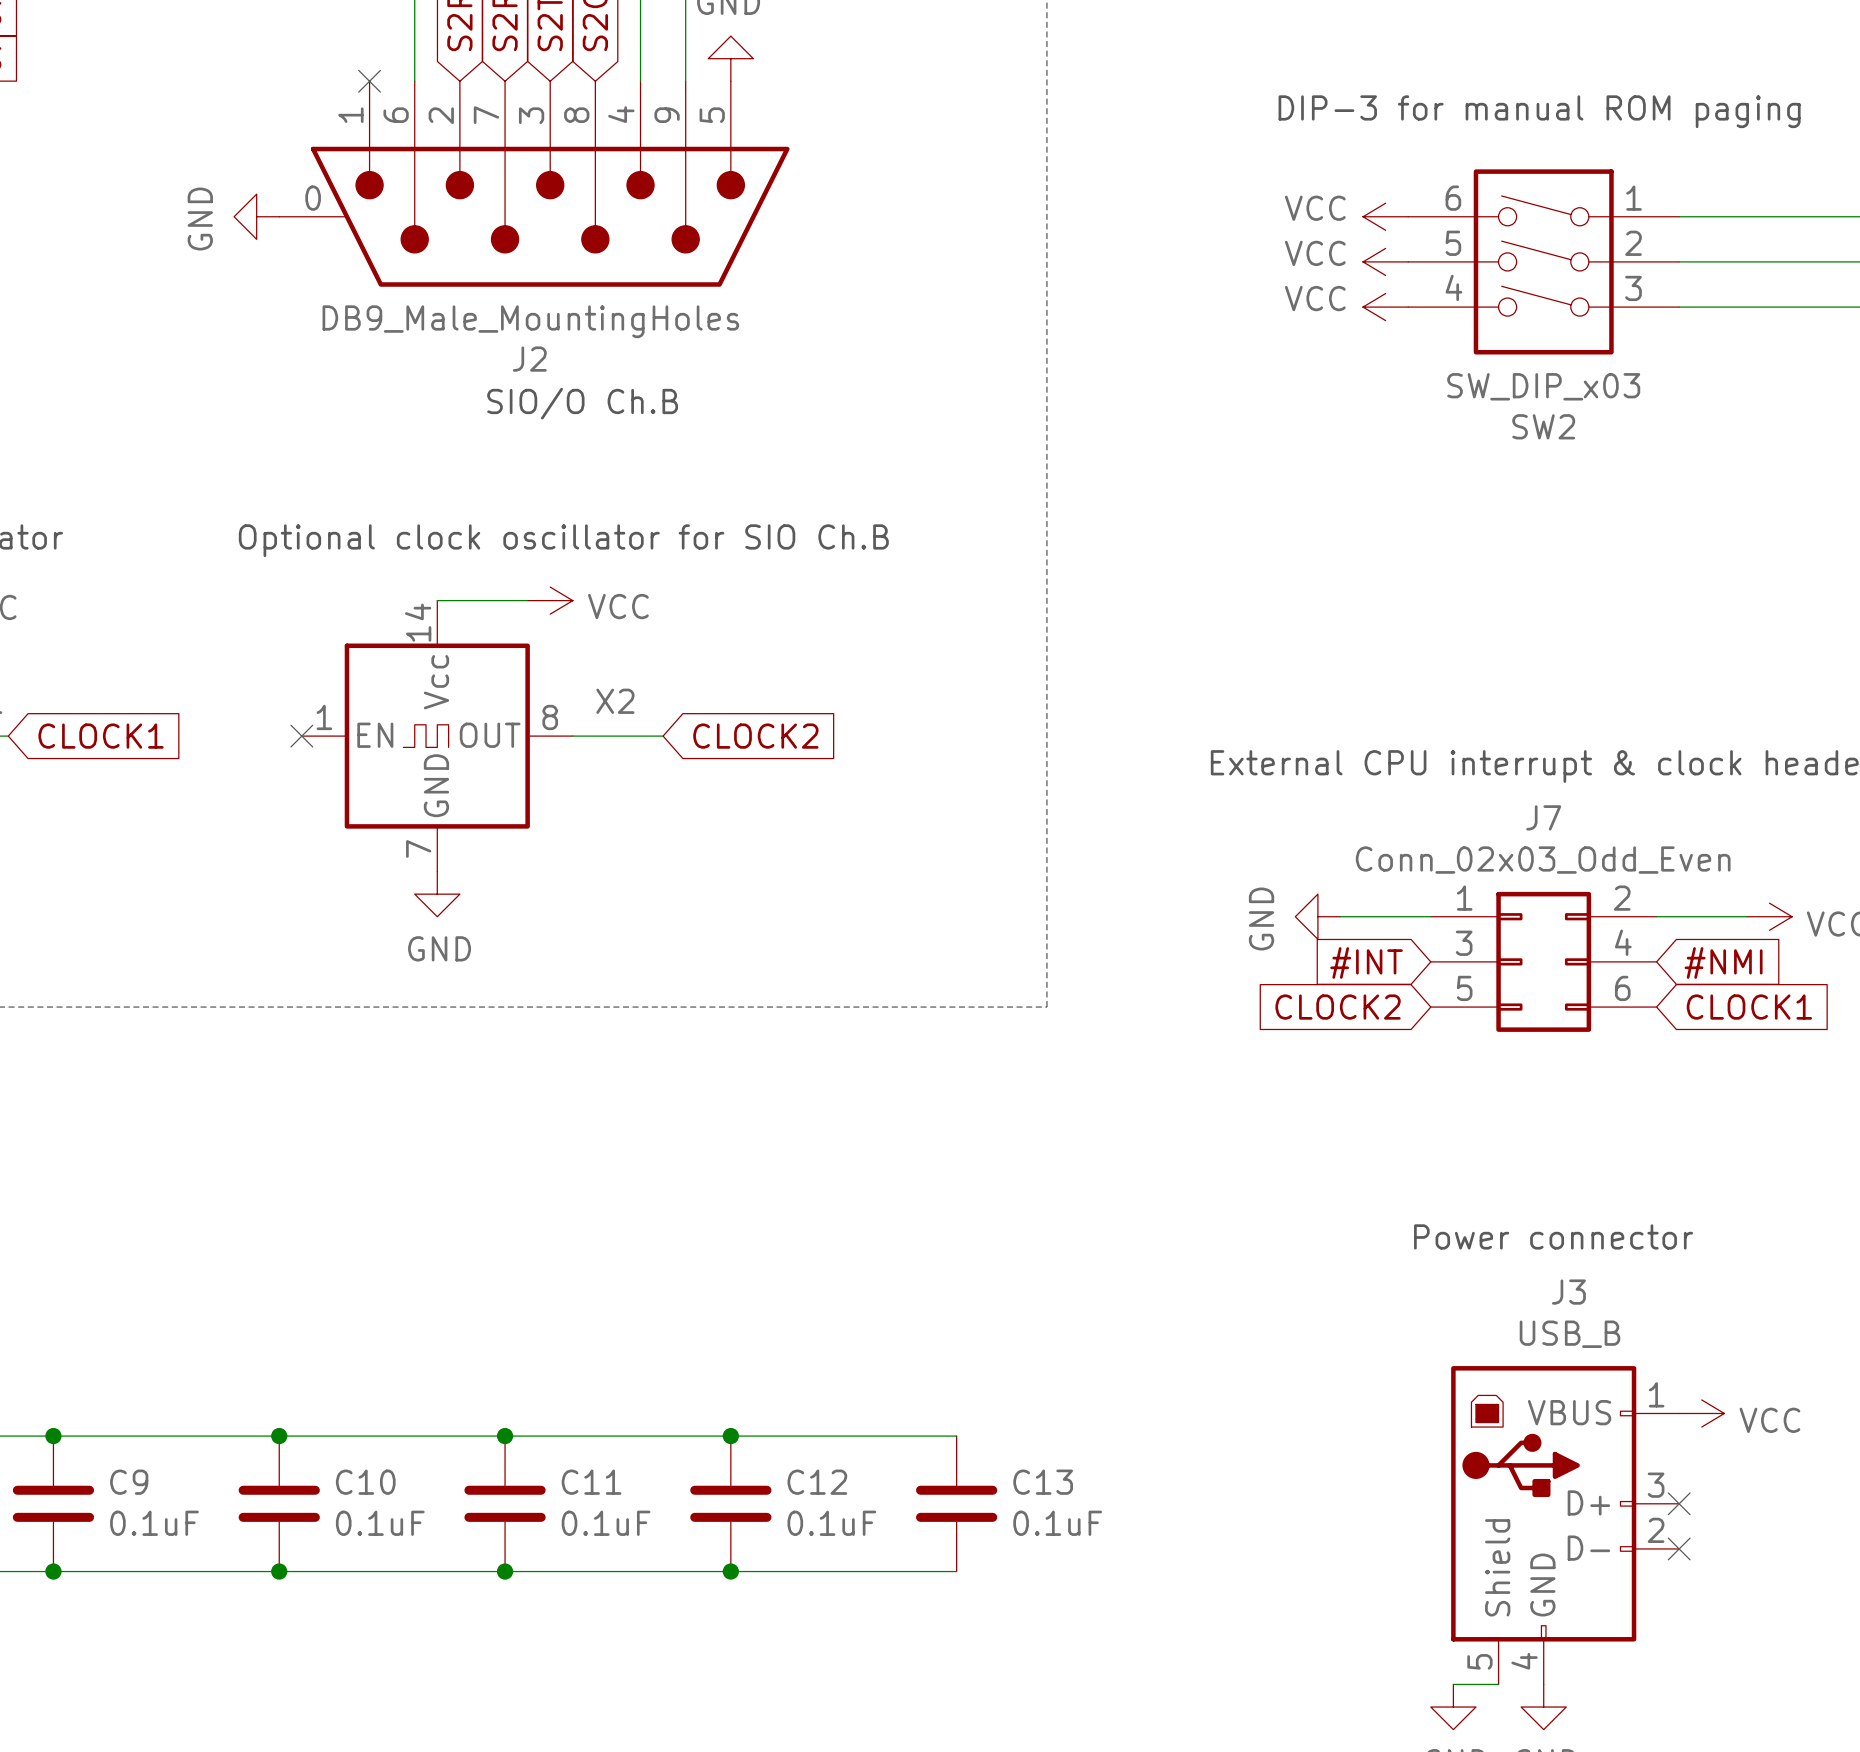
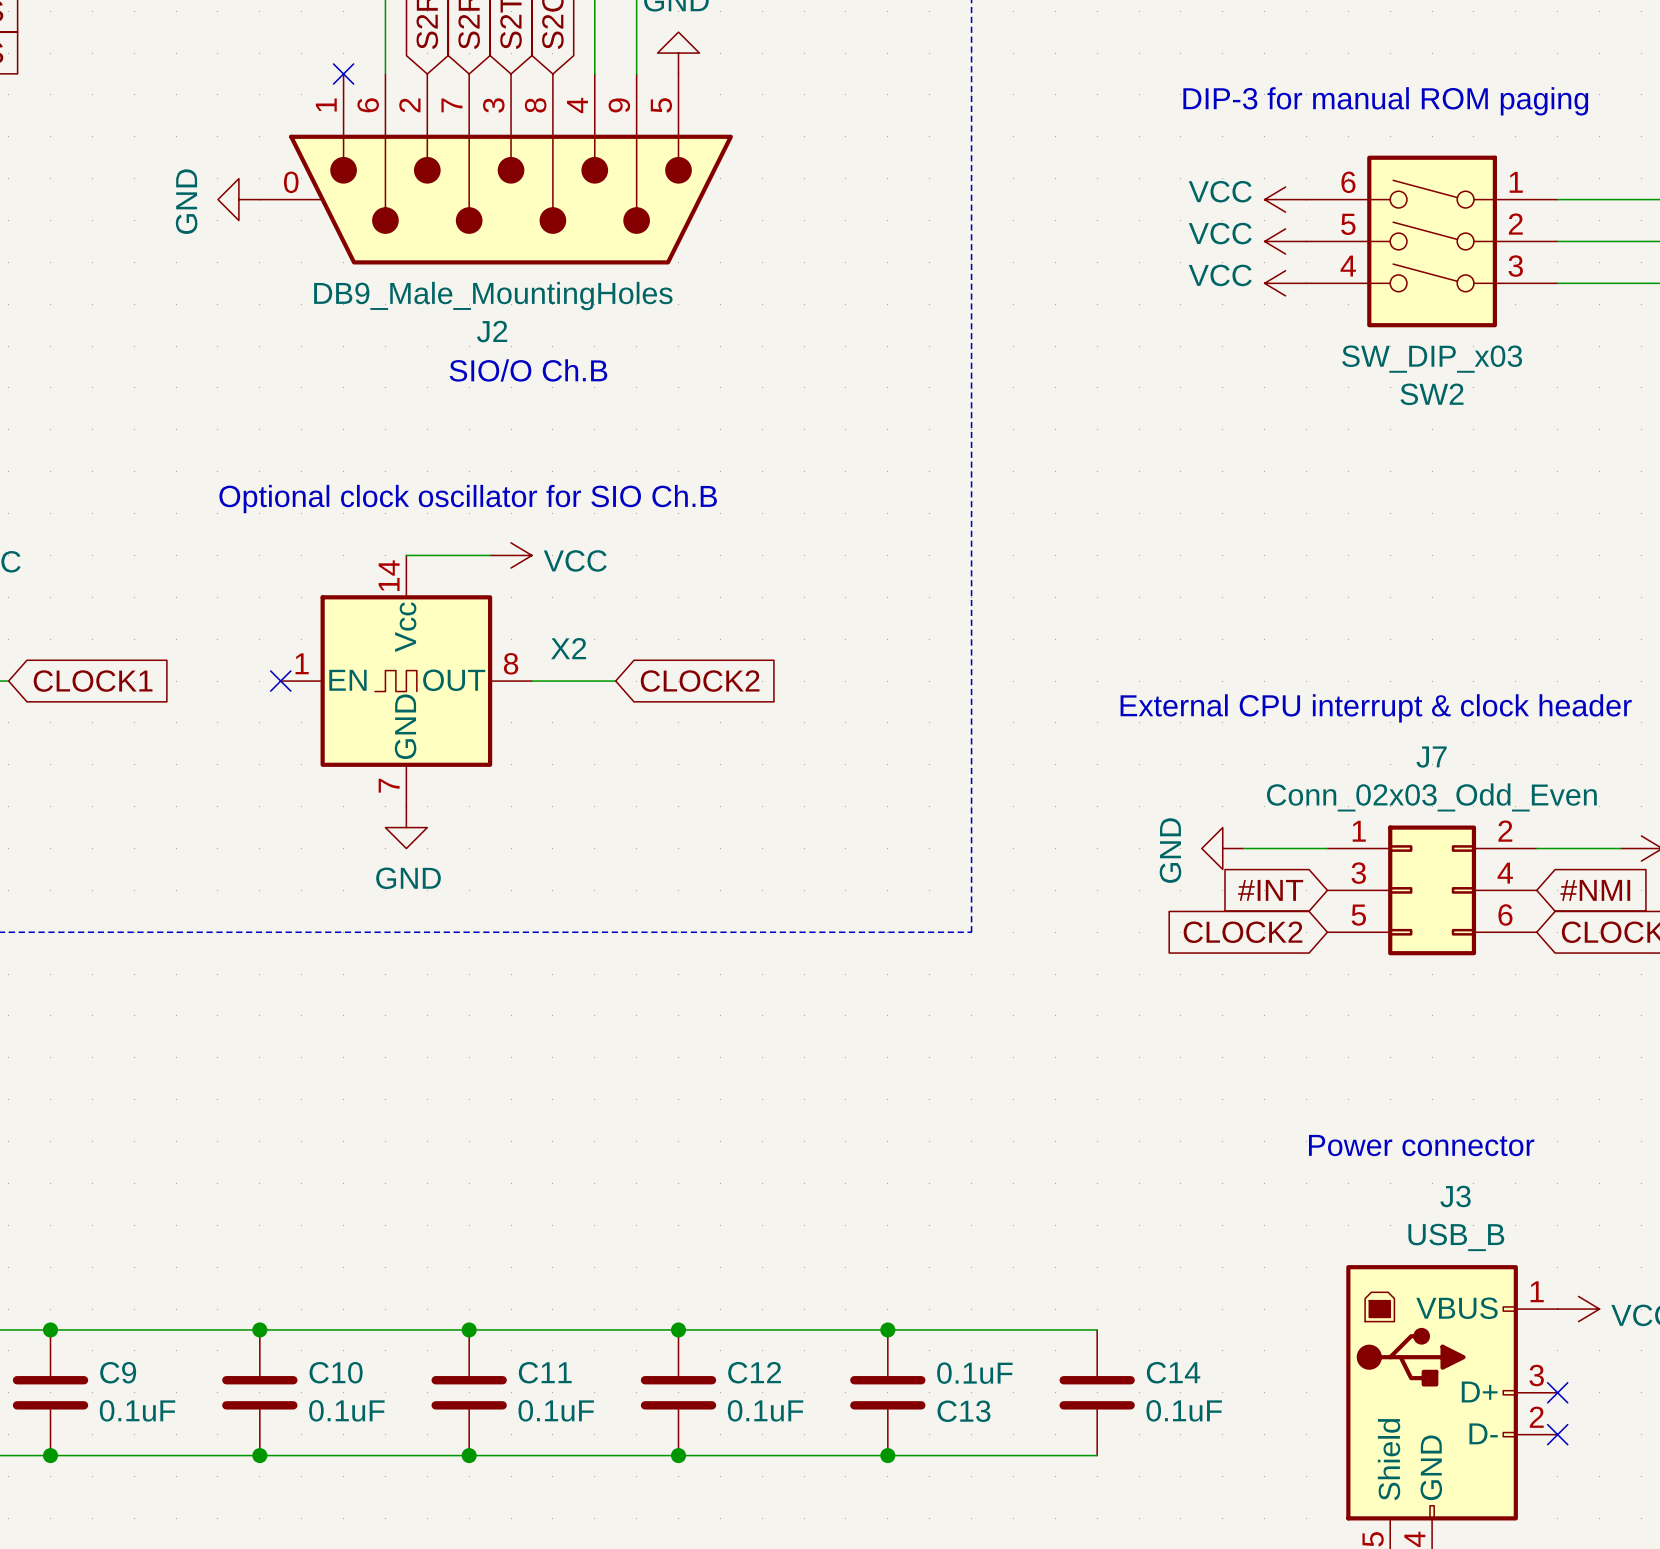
wire: none -> (887, 1329) (1097, 1329)
junction: none -> (887, 1329)
C13 name position: C13 (1043, 1482) -> C13 (963, 1411)
C14: none -> 0.1uF (1097, 1392)
C13 value position: 0.1uF (1057, 1523) -> 0.1uF (974, 1373)
wire: none -> (887, 1455) (1097, 1455)
junction: none -> (887, 1455)

